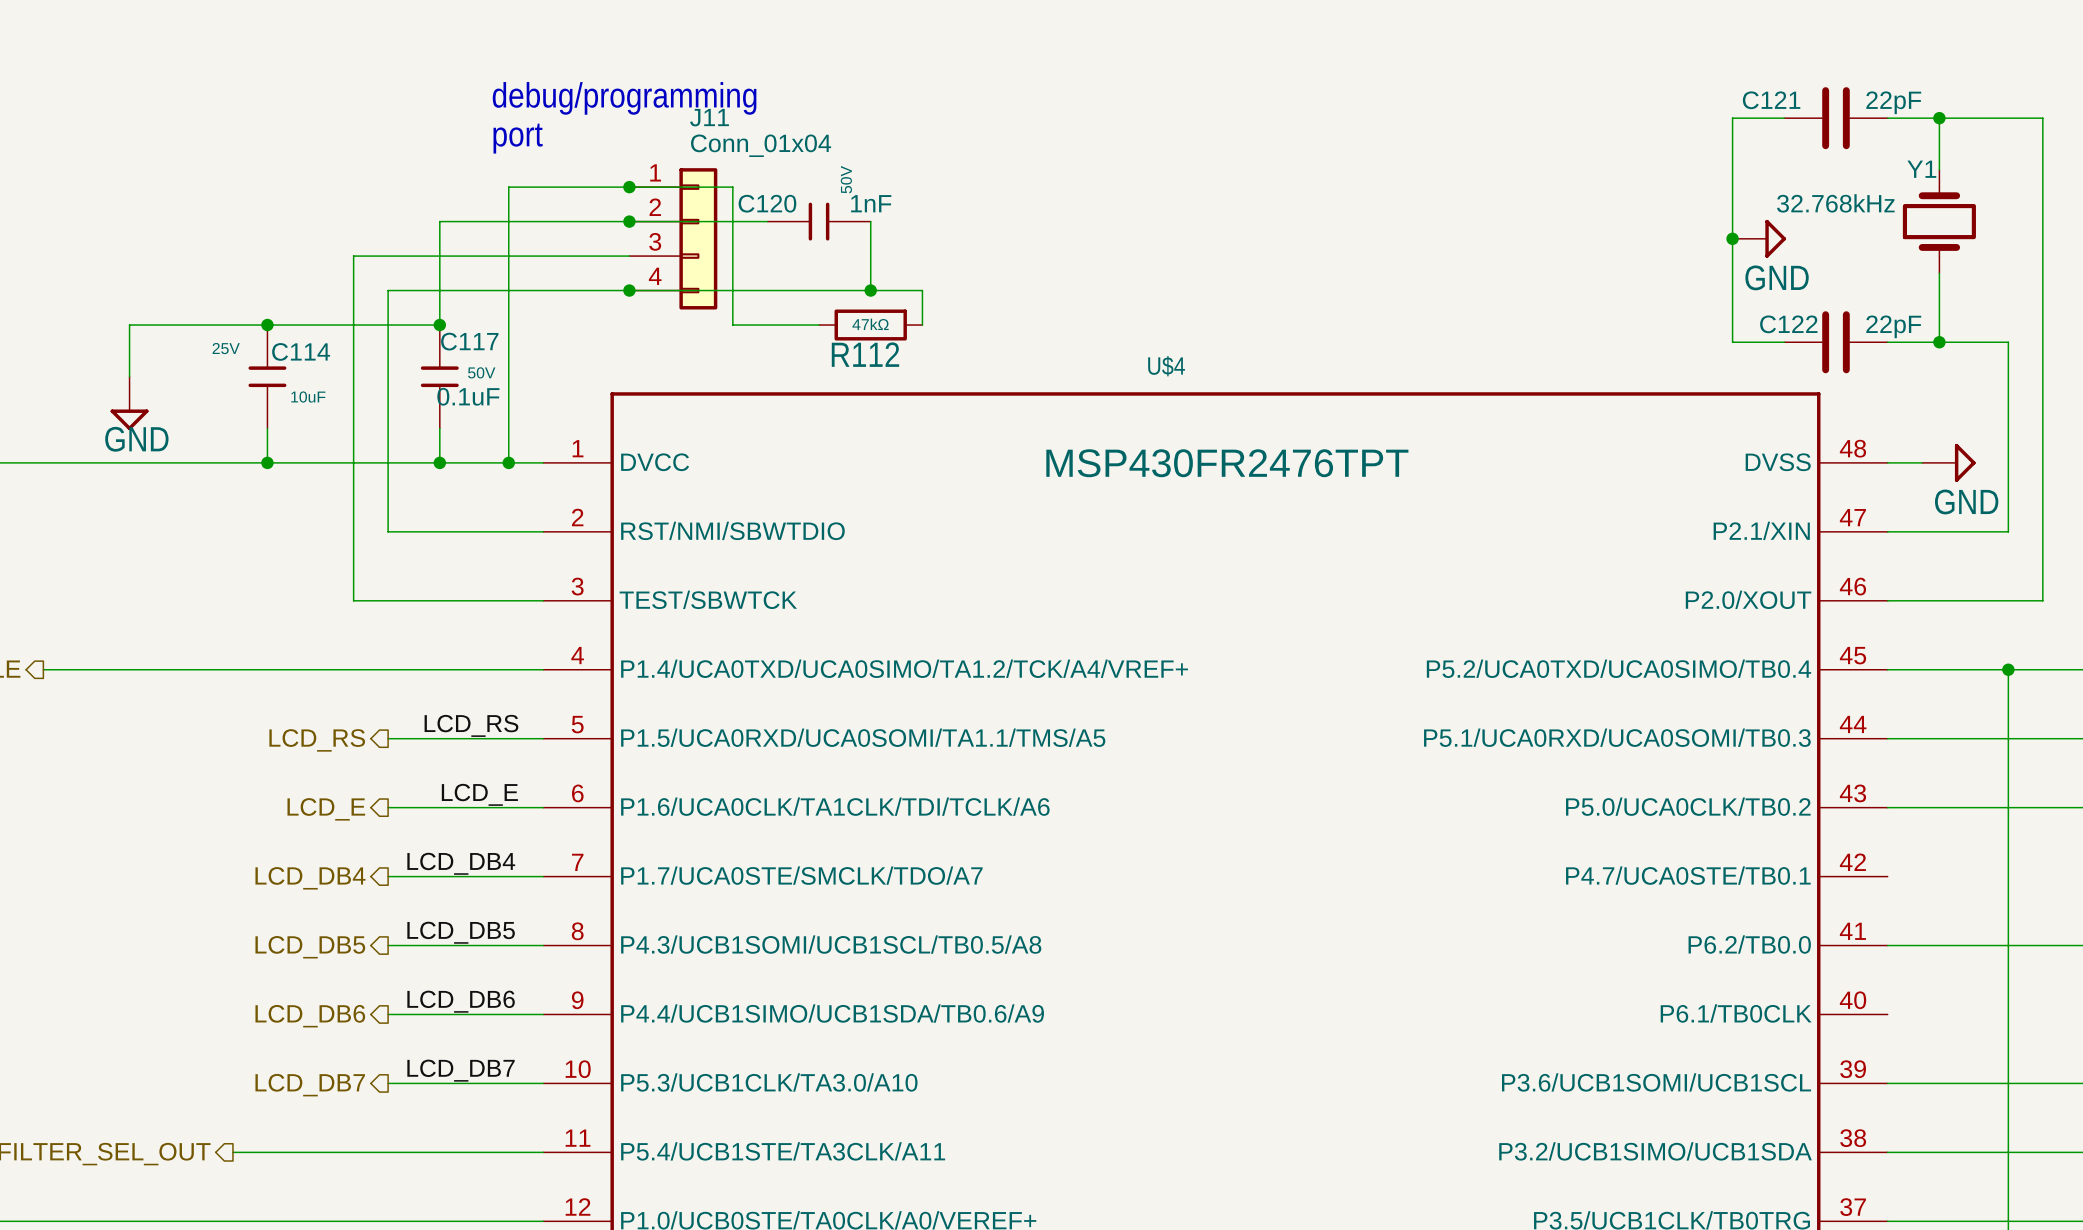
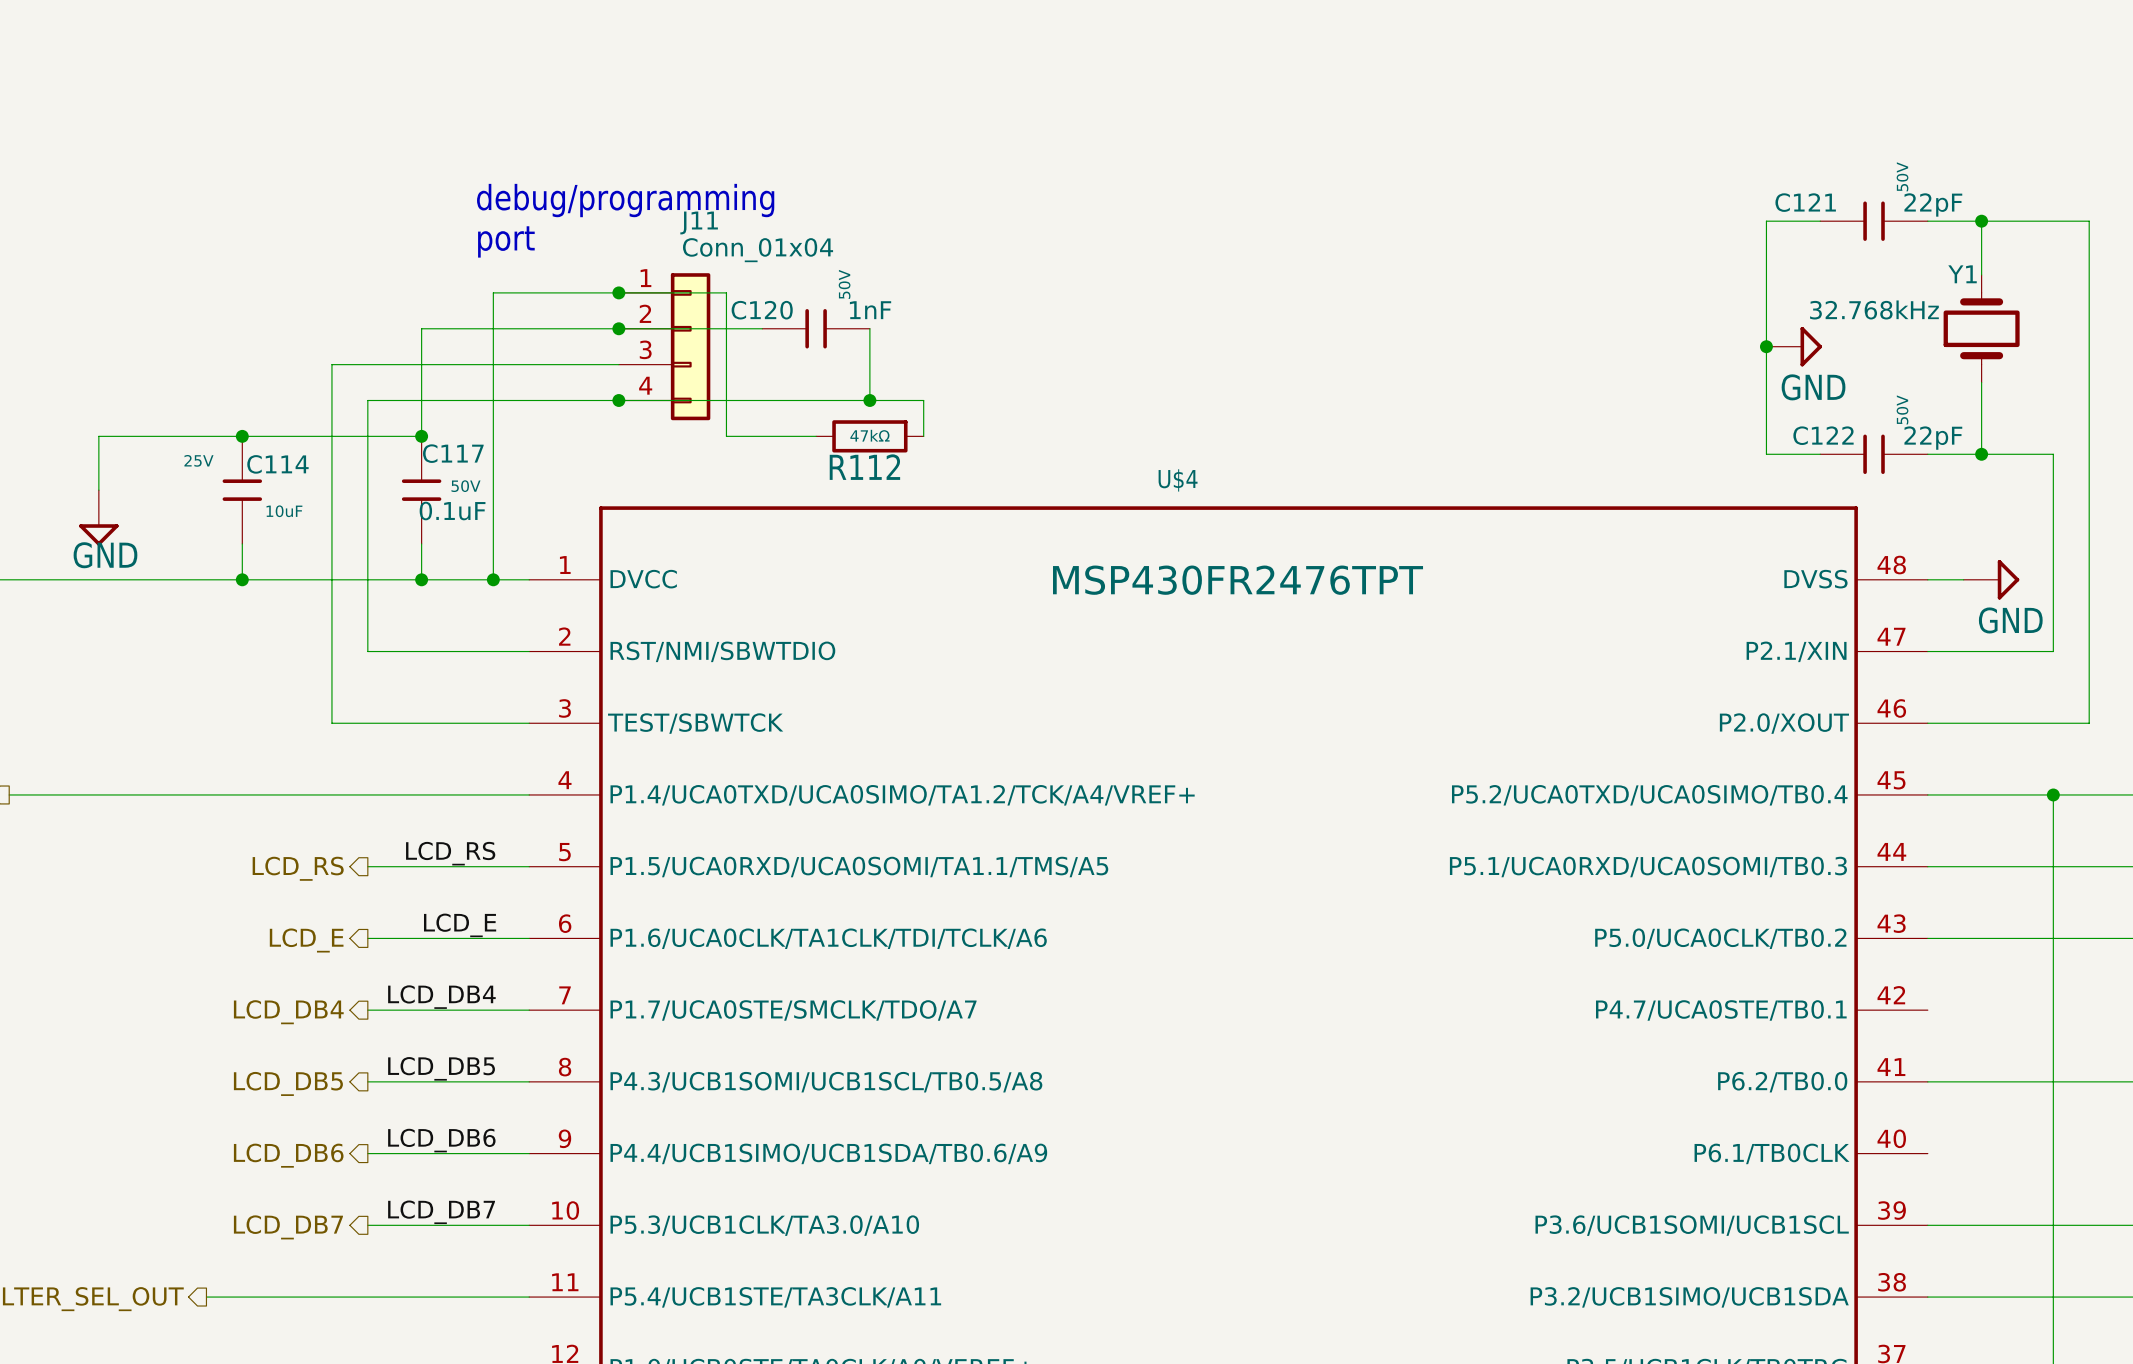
C121 text: none -> 50V (1902, 176)
C121 symbol: [1784, 87, 1888, 150] -> [1820, 201, 1928, 241]
C122 text: none -> 50V (1902, 409)
C122 symbol: [1784, 311, 1888, 374] -> [1820, 434, 1928, 475]

